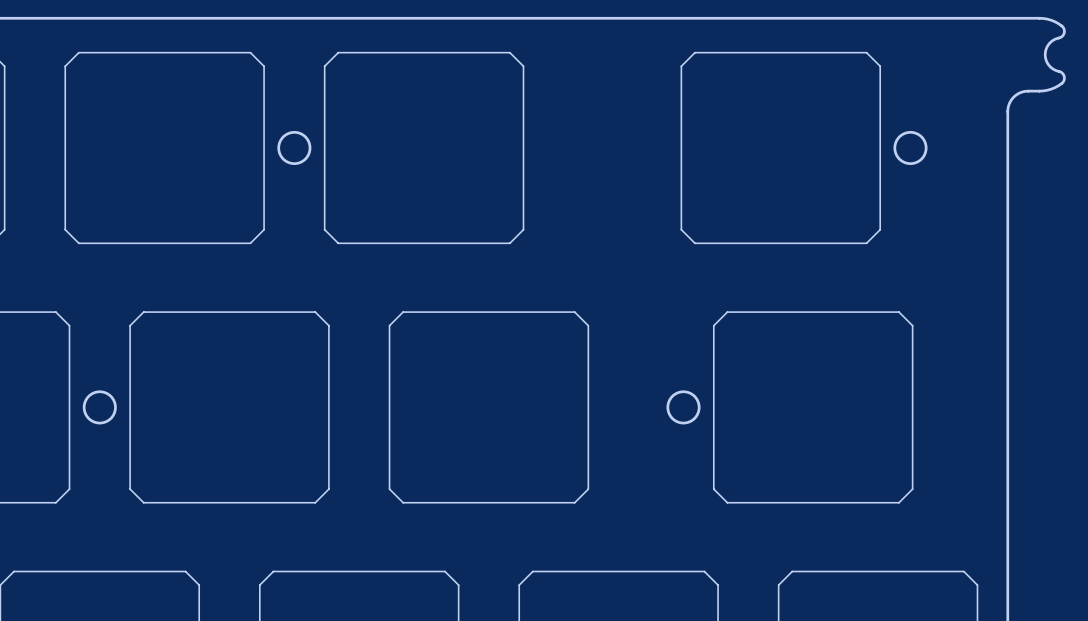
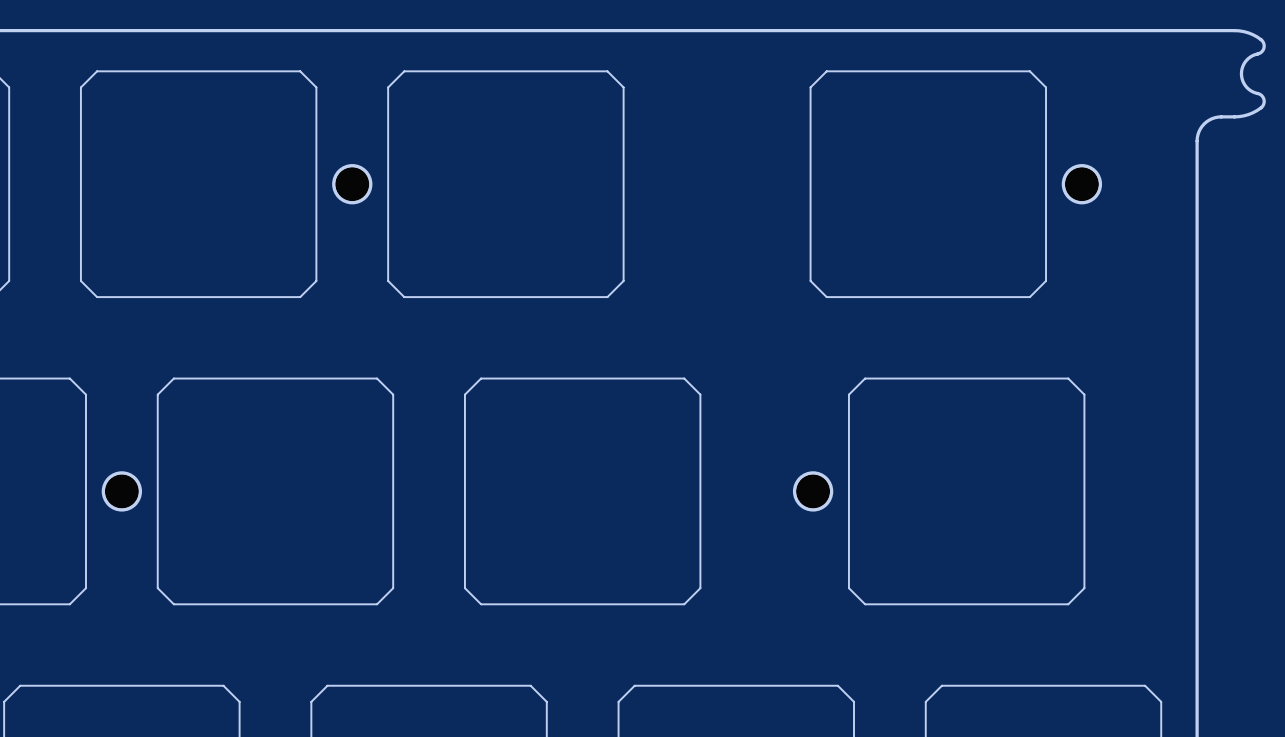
part: none -> (352, 184)
part: none -> (1081, 184)
part: none -> (121, 491)
part: none -> (813, 491)

